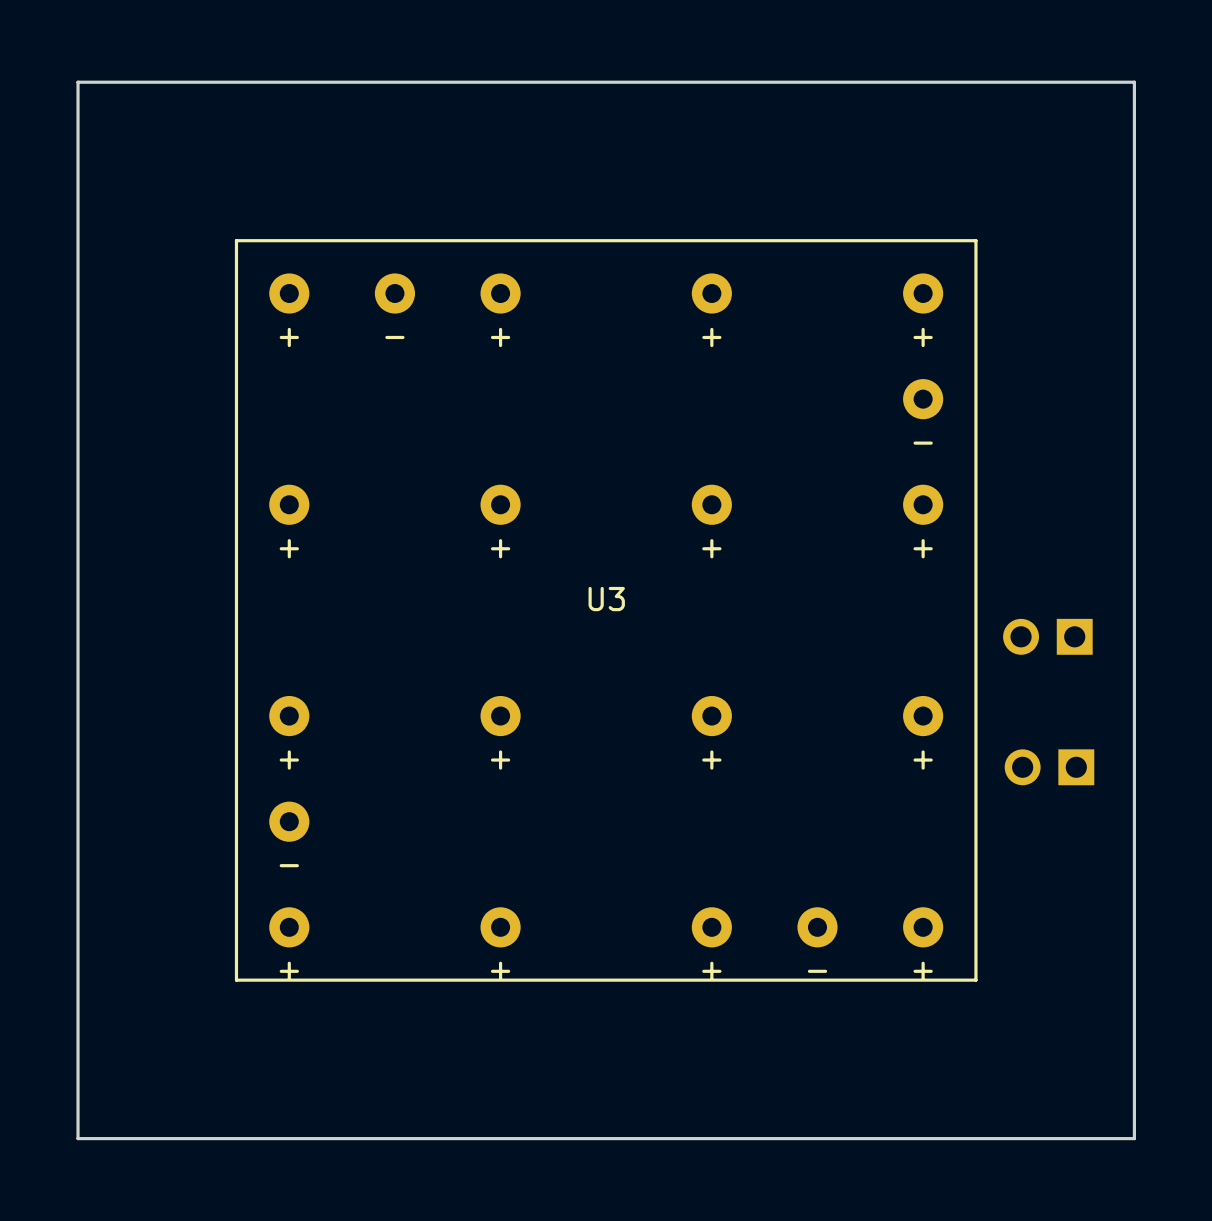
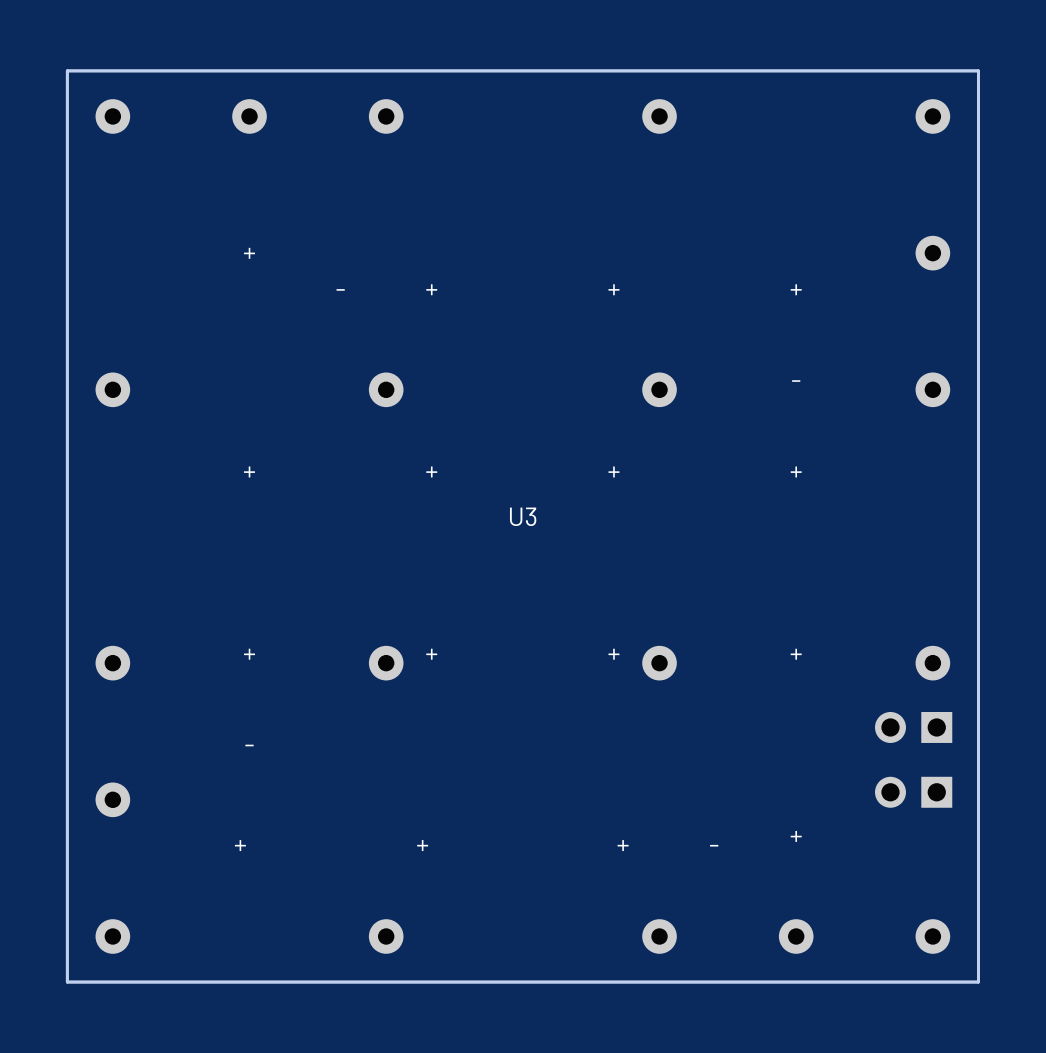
U3 footprint: [234, 239, 978, 982] -> [65, 69, 980, 984]
part: (1047, 636) -> none
part: (1049, 767) -> none
part: none -> (913, 727)
part: none -> (913, 792)

